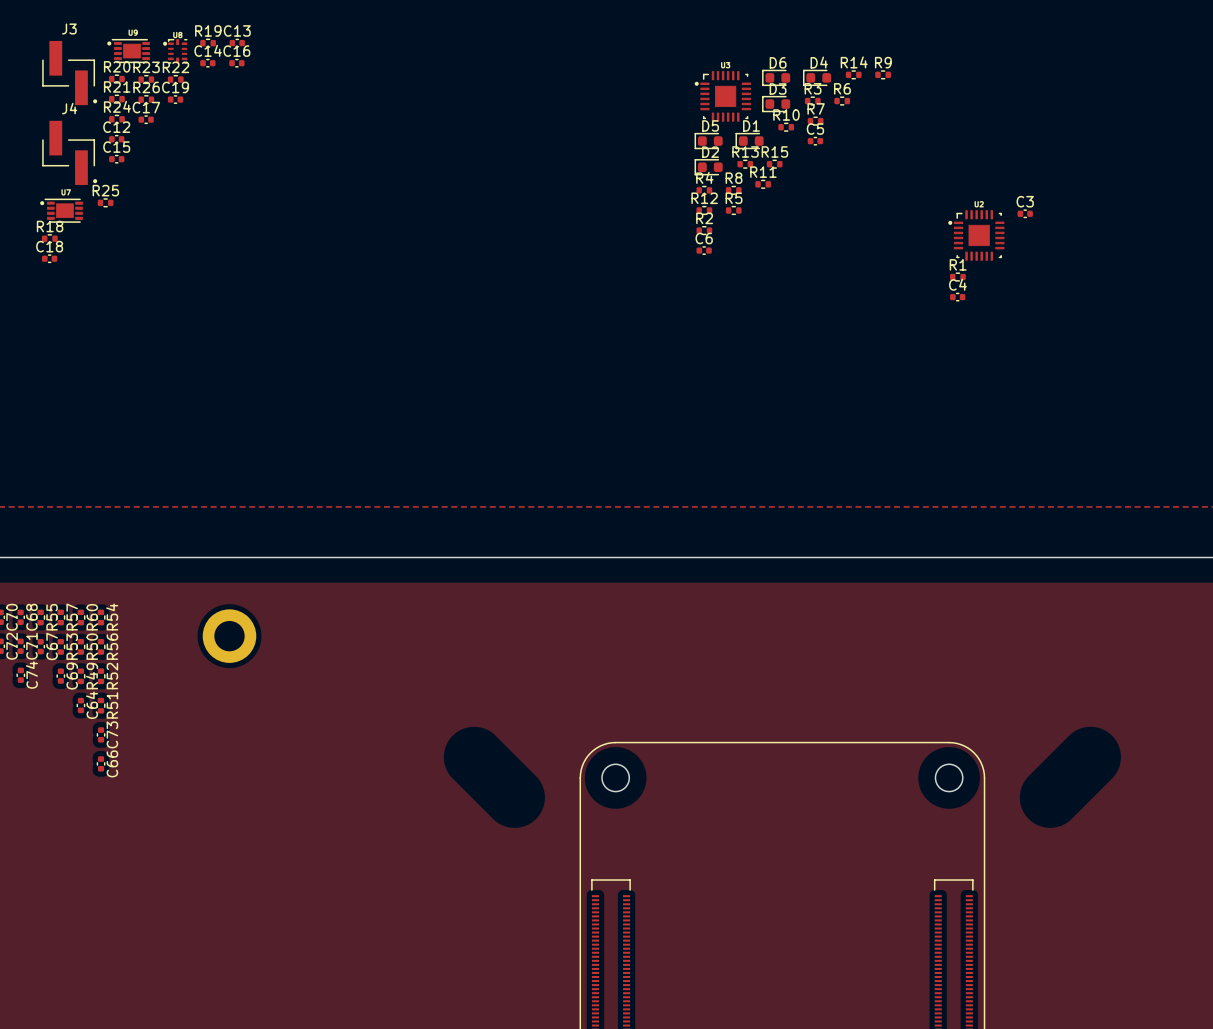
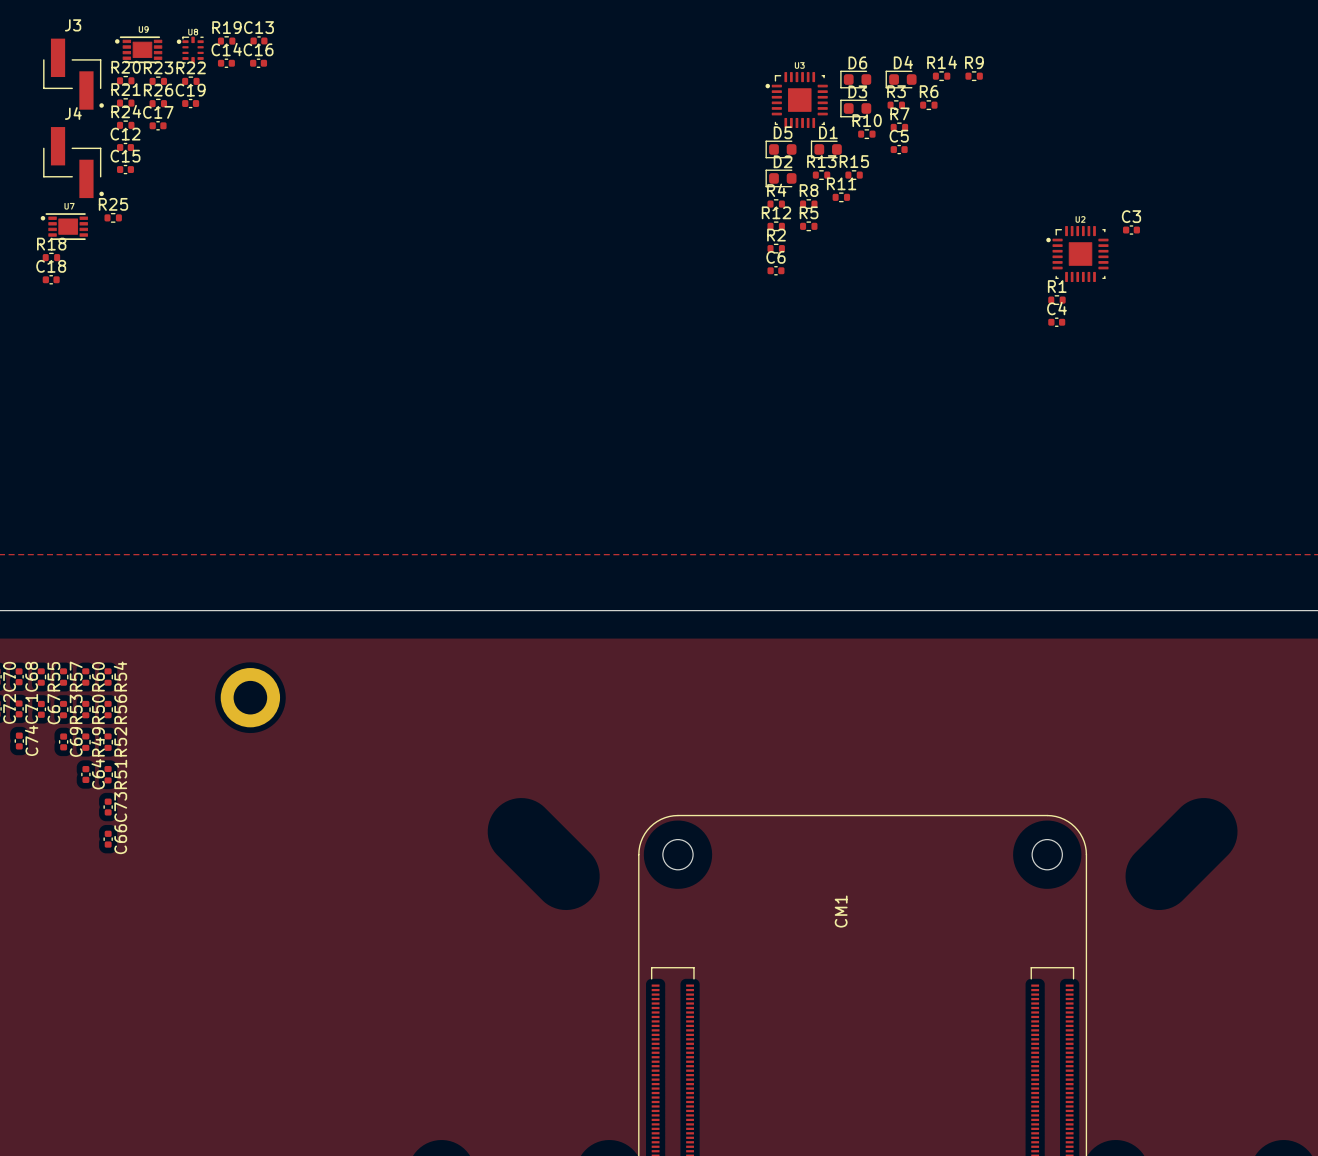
CM1 name: none -> CM1 (841, 911)

